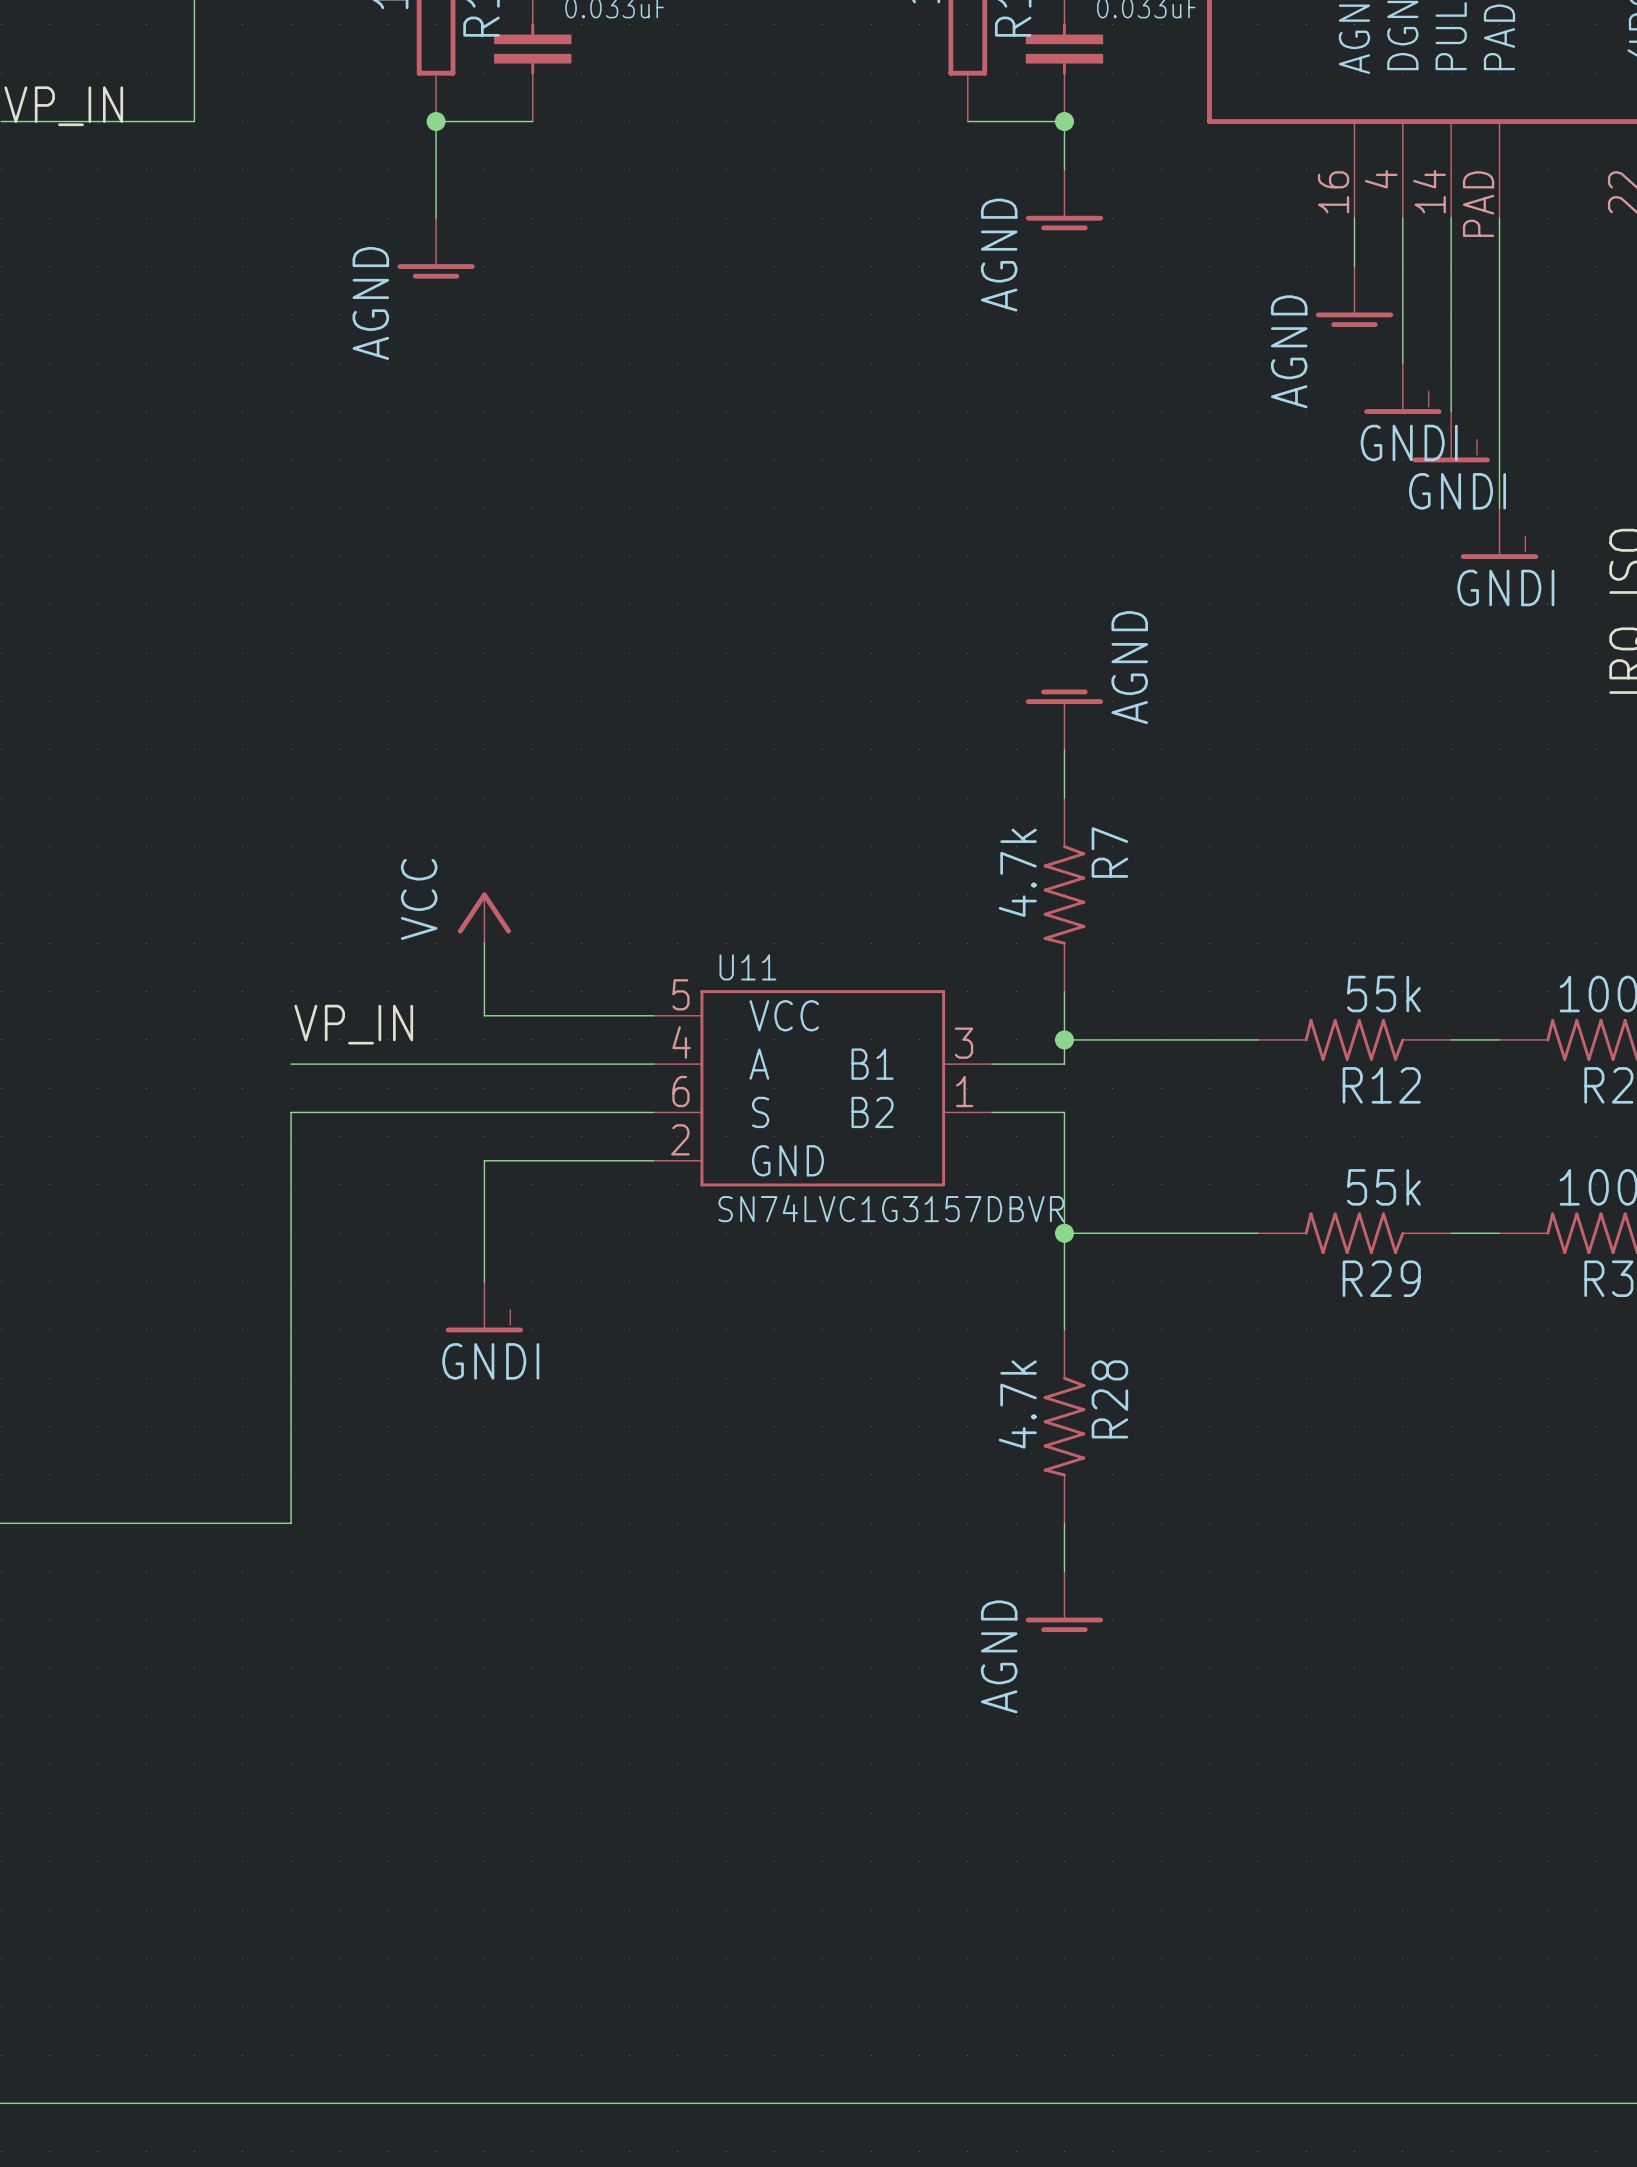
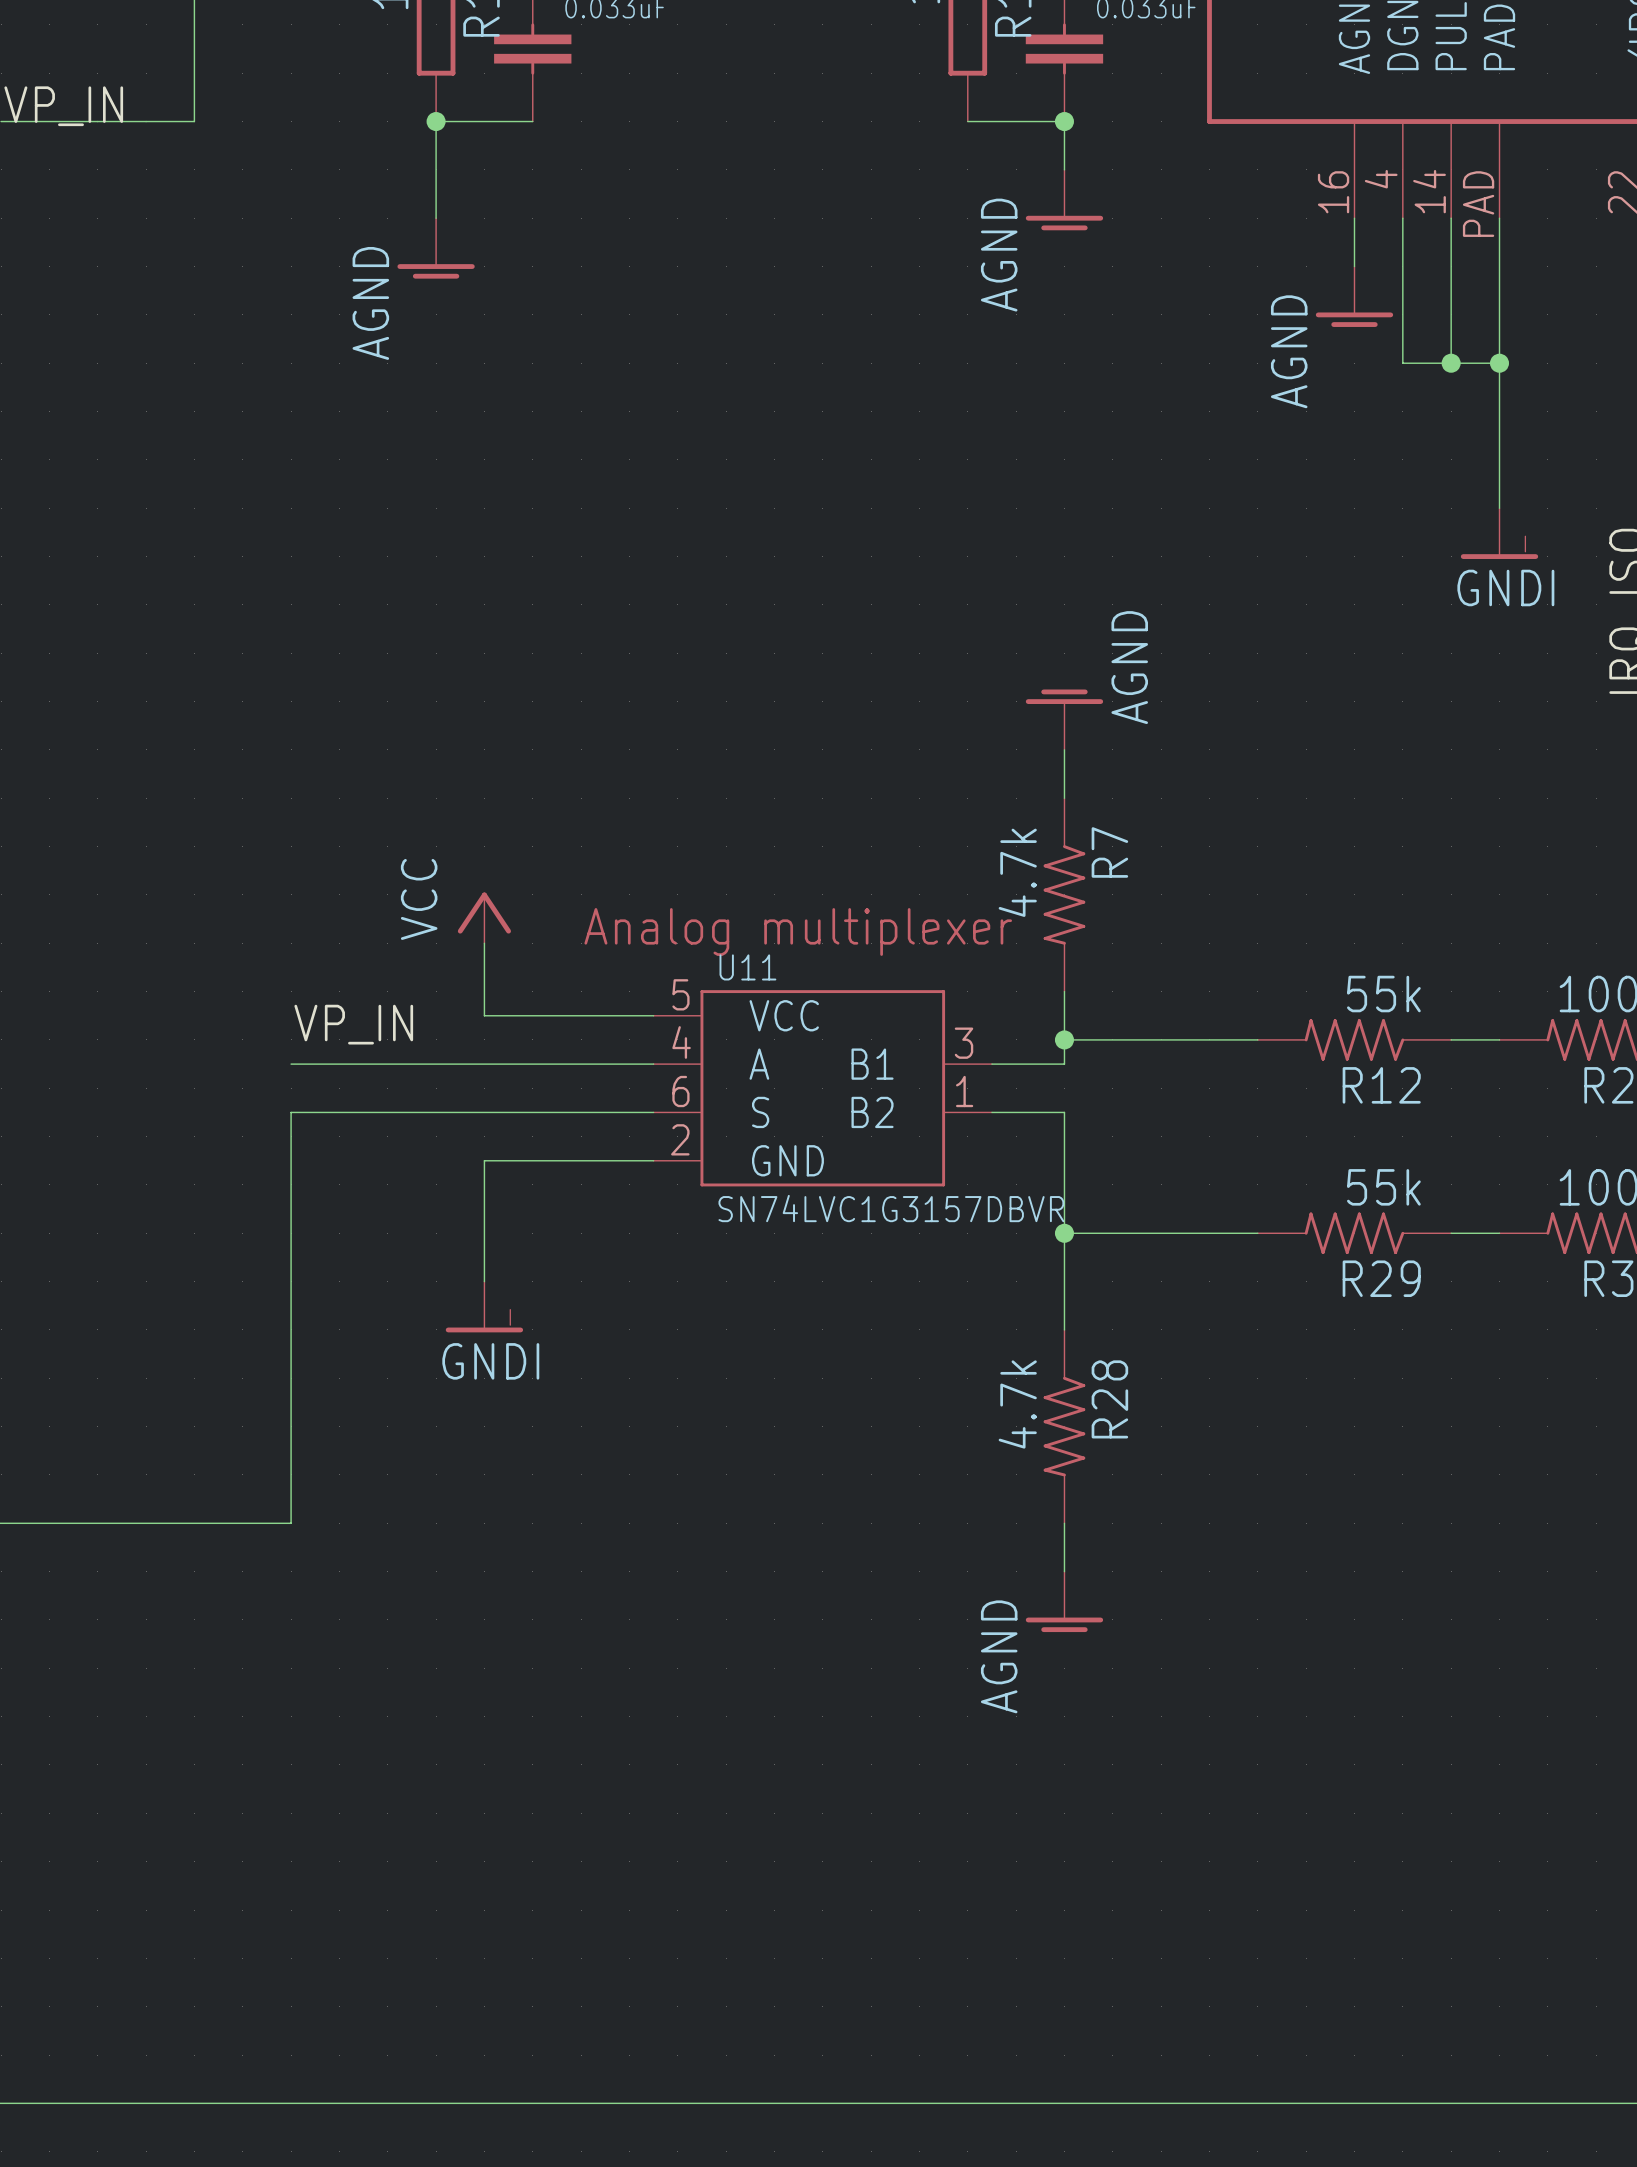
wire: none -> (1402, 363) (1499, 363)
wire: (1451, 363) (1451, 411) -> none
junction: none -> (1451, 363)
junction: none -> (1499, 363)
power symbol: GNDI (1402, 388) -> none
power symbol: GNDI (1451, 436) -> none
text: none -> Analog multiplexer (798, 931)

